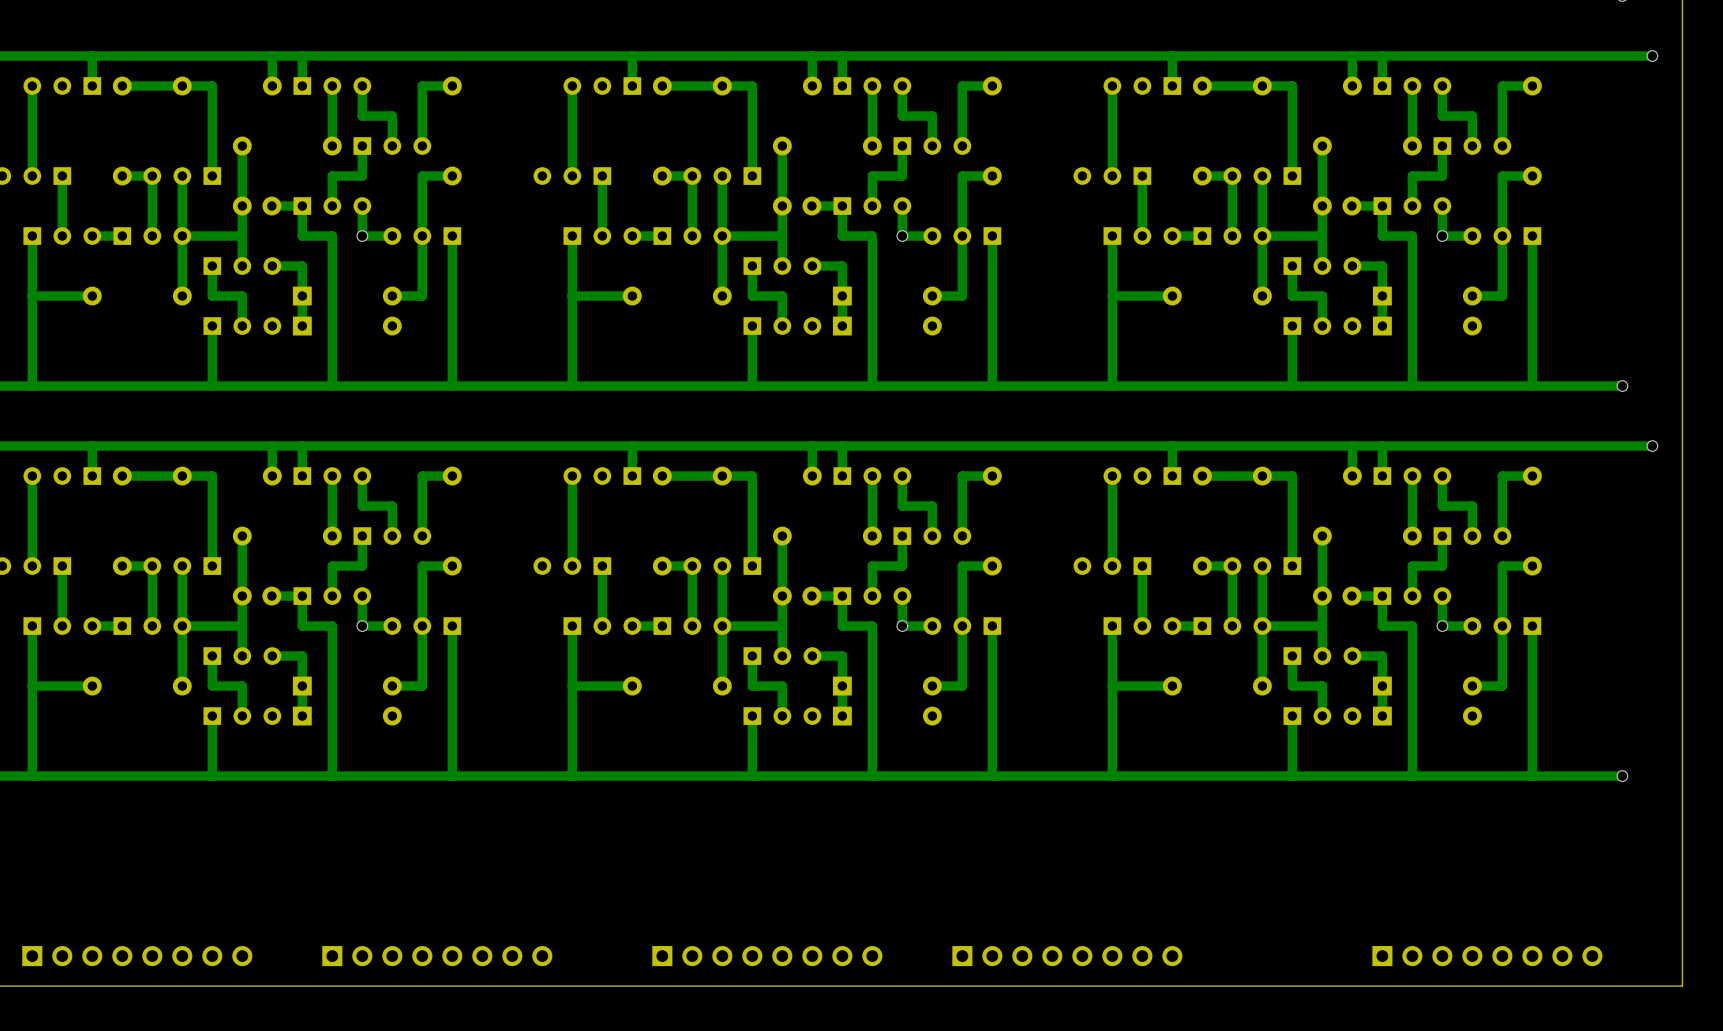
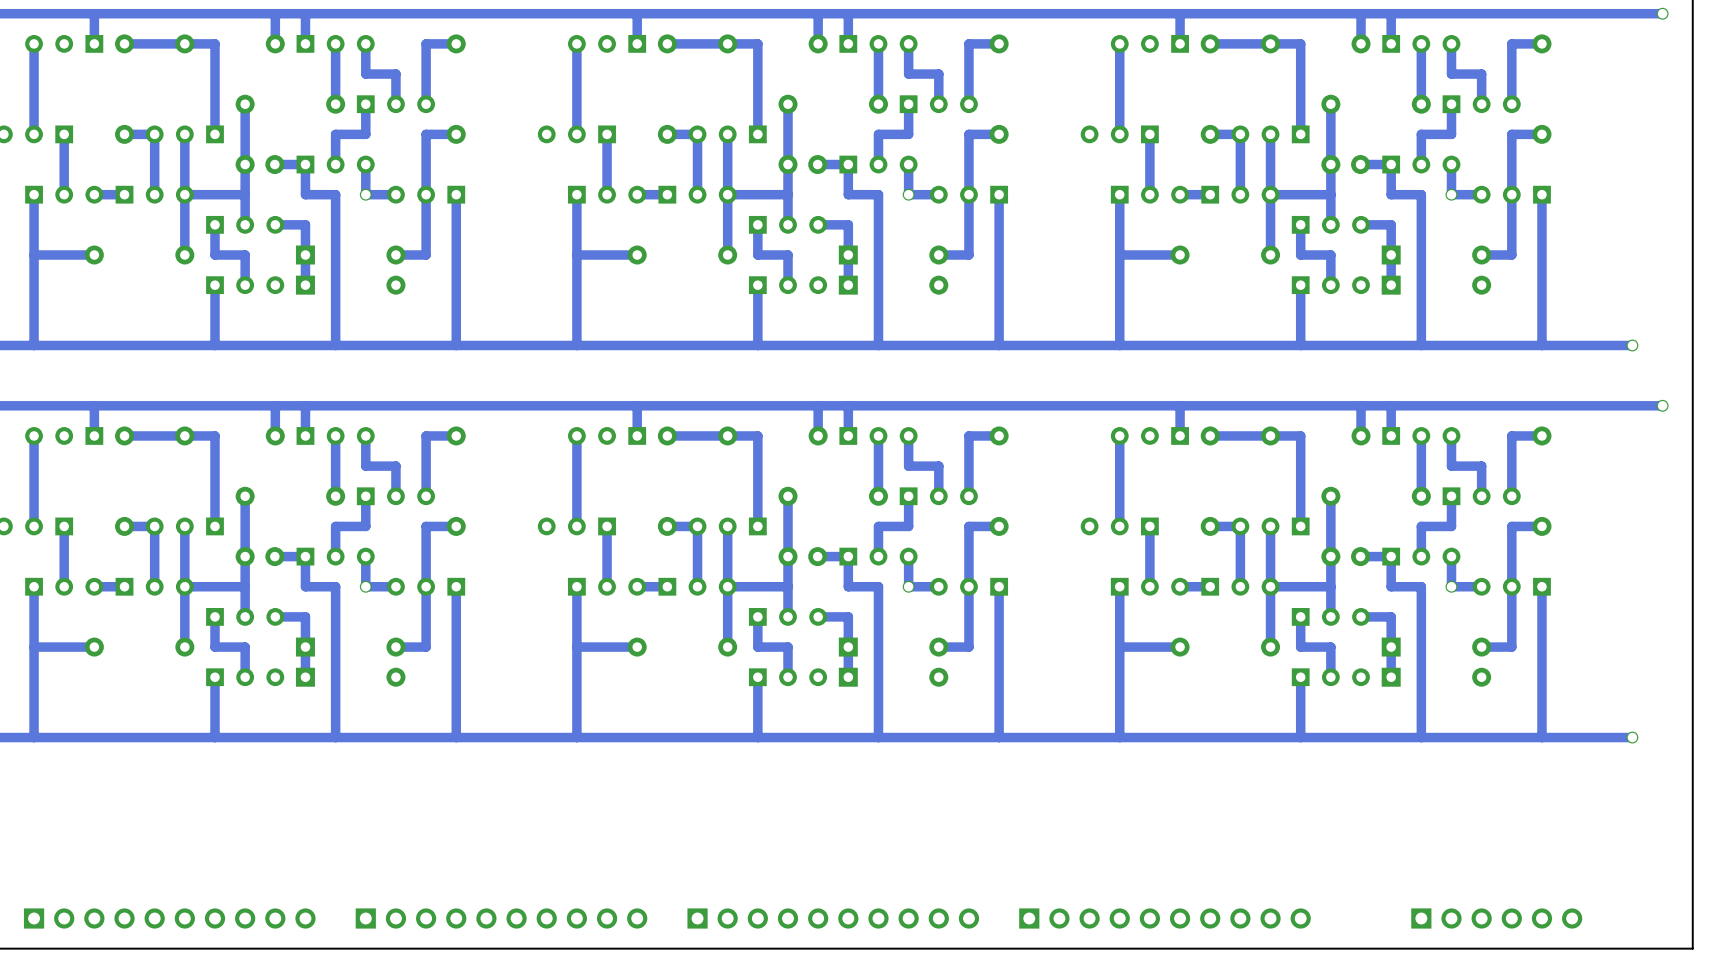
part footprint: [1372, 946, 1603, 967] -> [1411, 908, 1583, 929]
part: none -> (169, 918)
part: (437, 956) -> none
part: none -> (501, 918)
part: (767, 956) -> none
part: none -> (833, 918)
part: (1067, 956) -> none
part: none -> (1164, 918)

